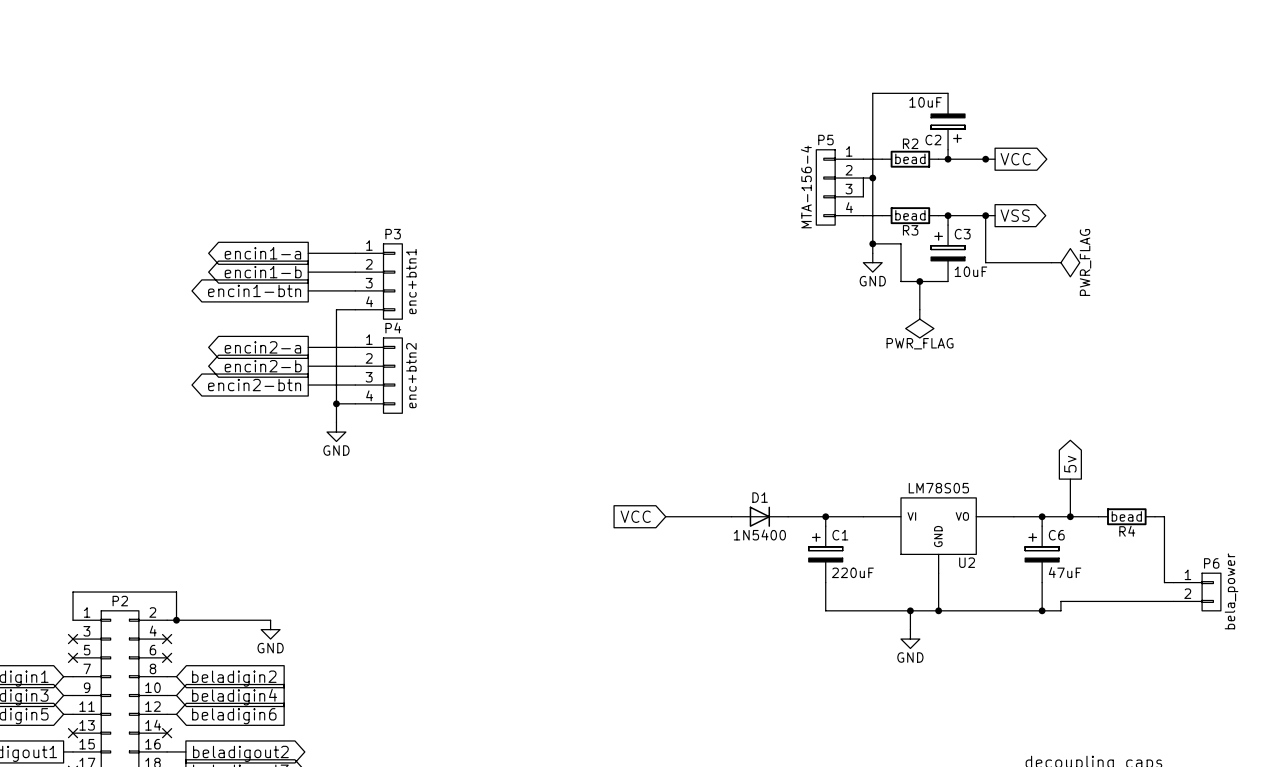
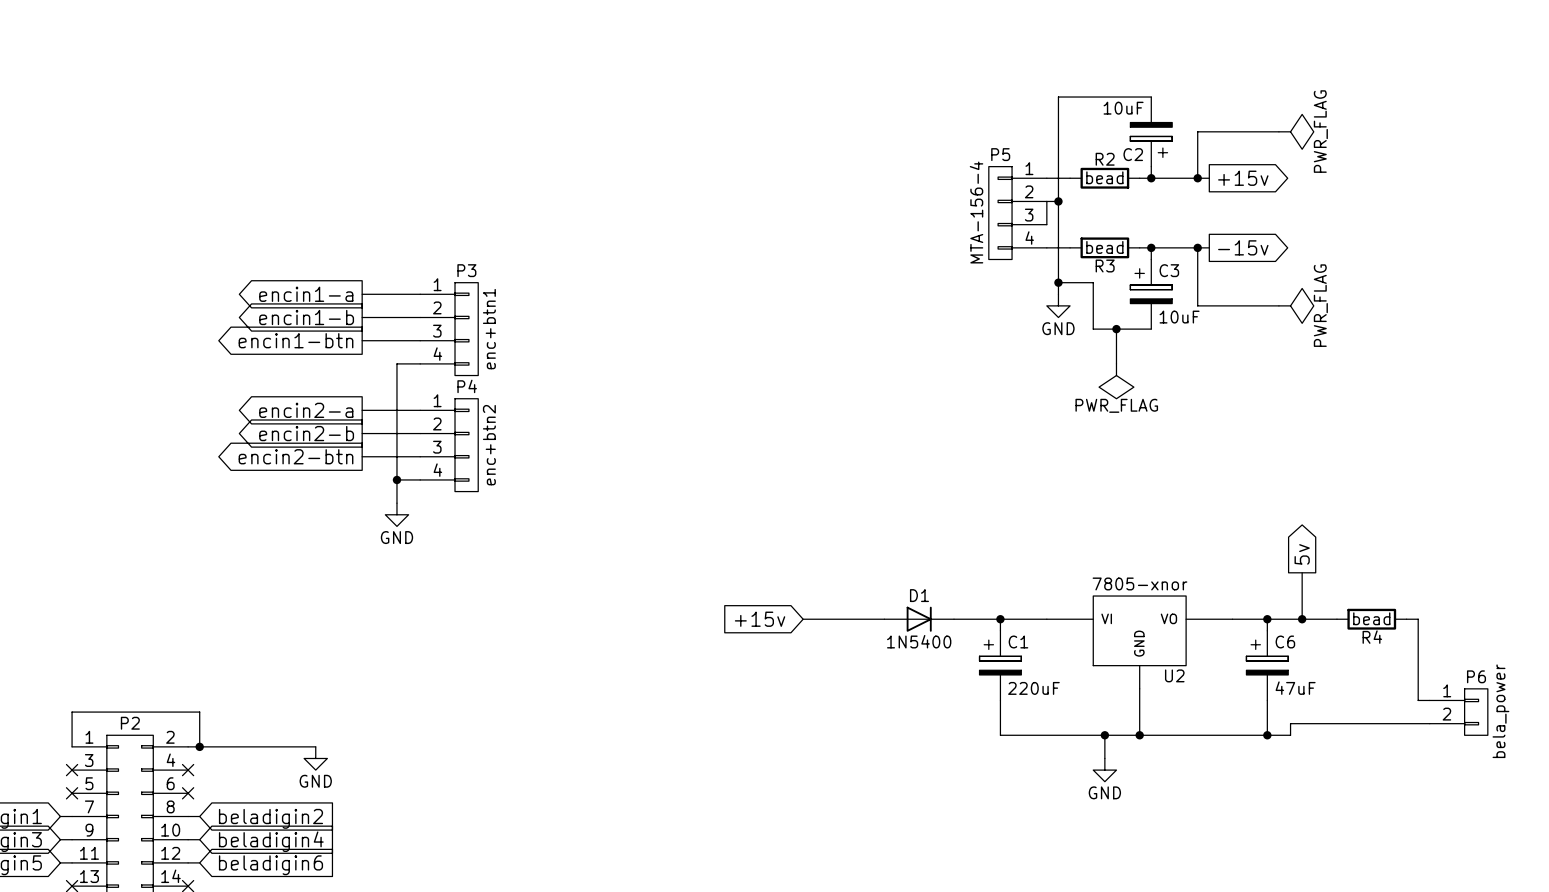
wire: none -> (1278, 131) (1197, 131) (1197, 178)
power symbol: none -> PWR_FLAG (1296, 131)
global label: VCC (1015, 159) -> +15v (1243, 178)
global label: VSS (1015, 215) -> -15v (1243, 247)
U2 value: LM78S05 (938, 488) -> 7805-xnor (1139, 583)
global label: VCC (635, 516) -> +15v (760, 619)

